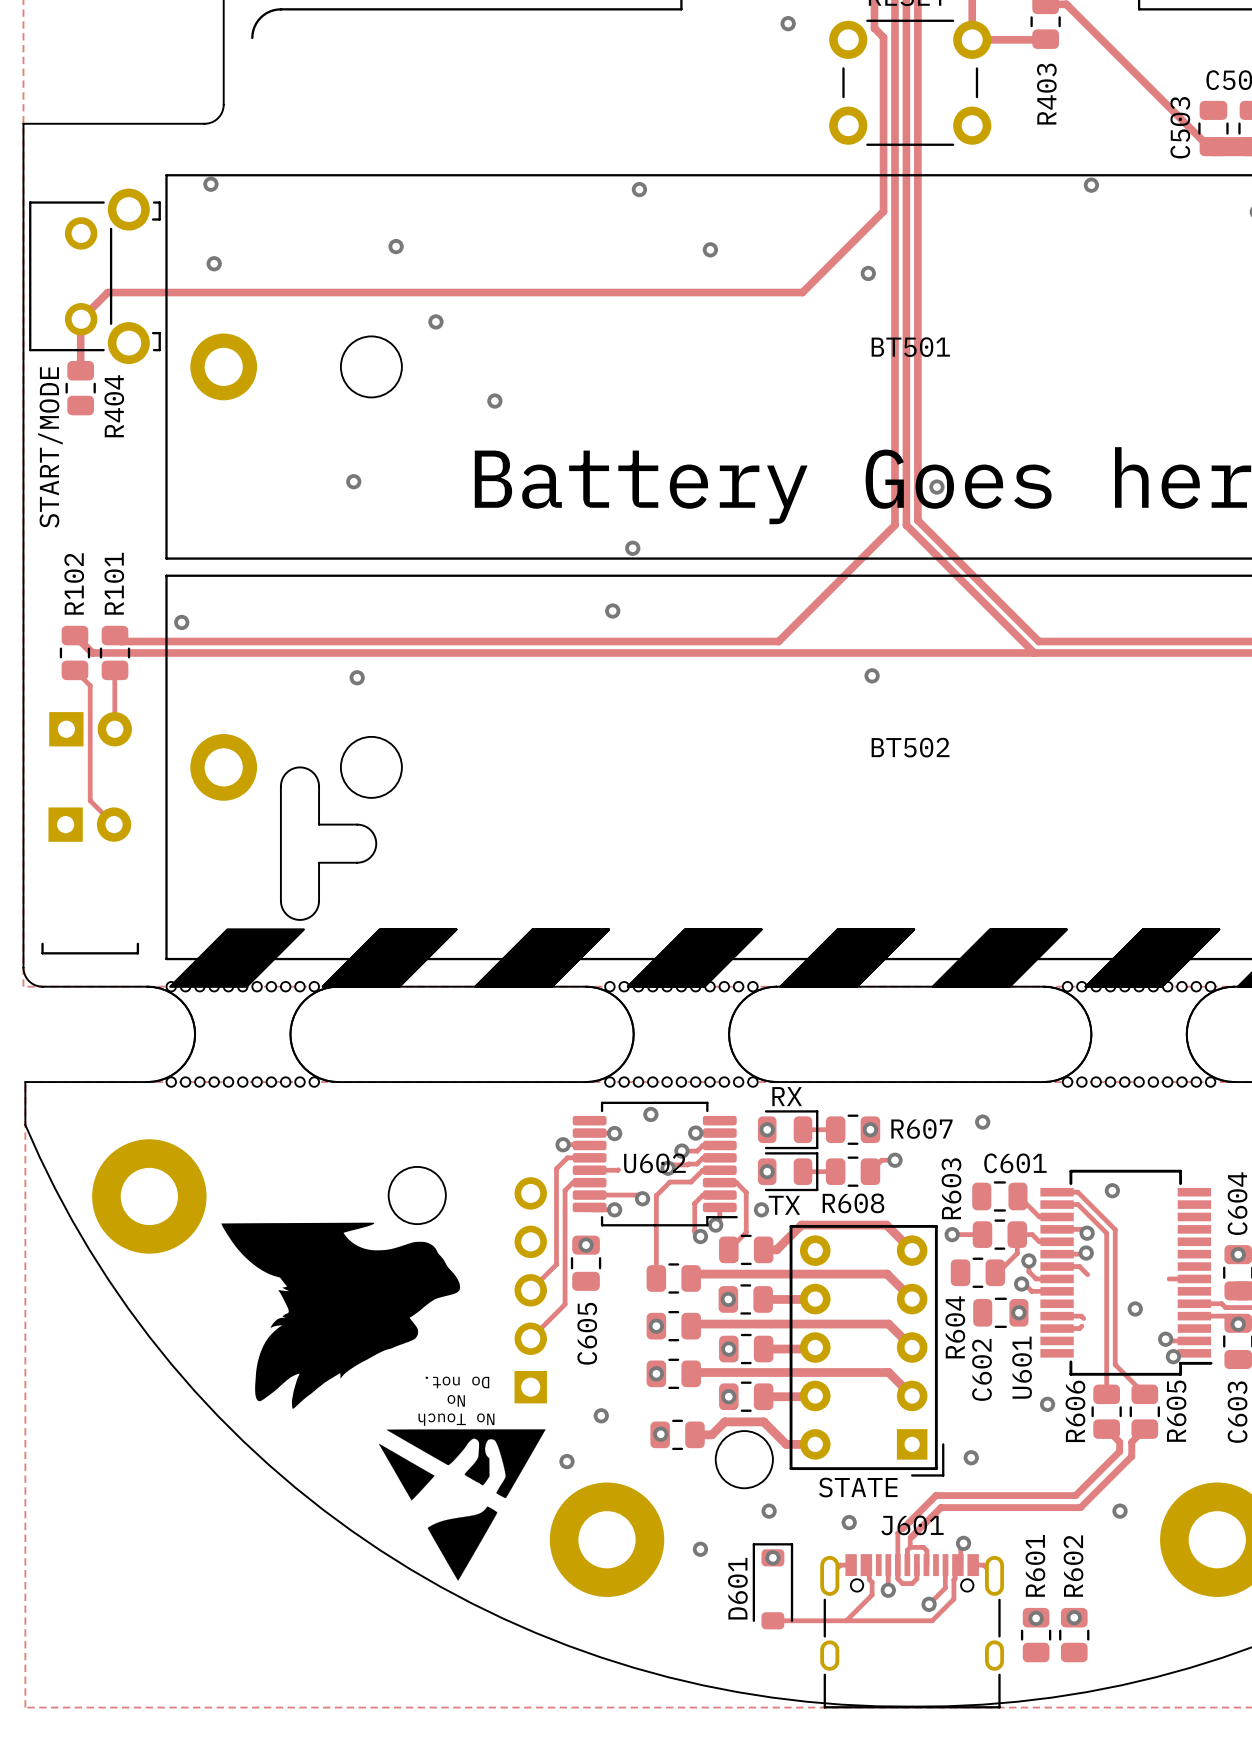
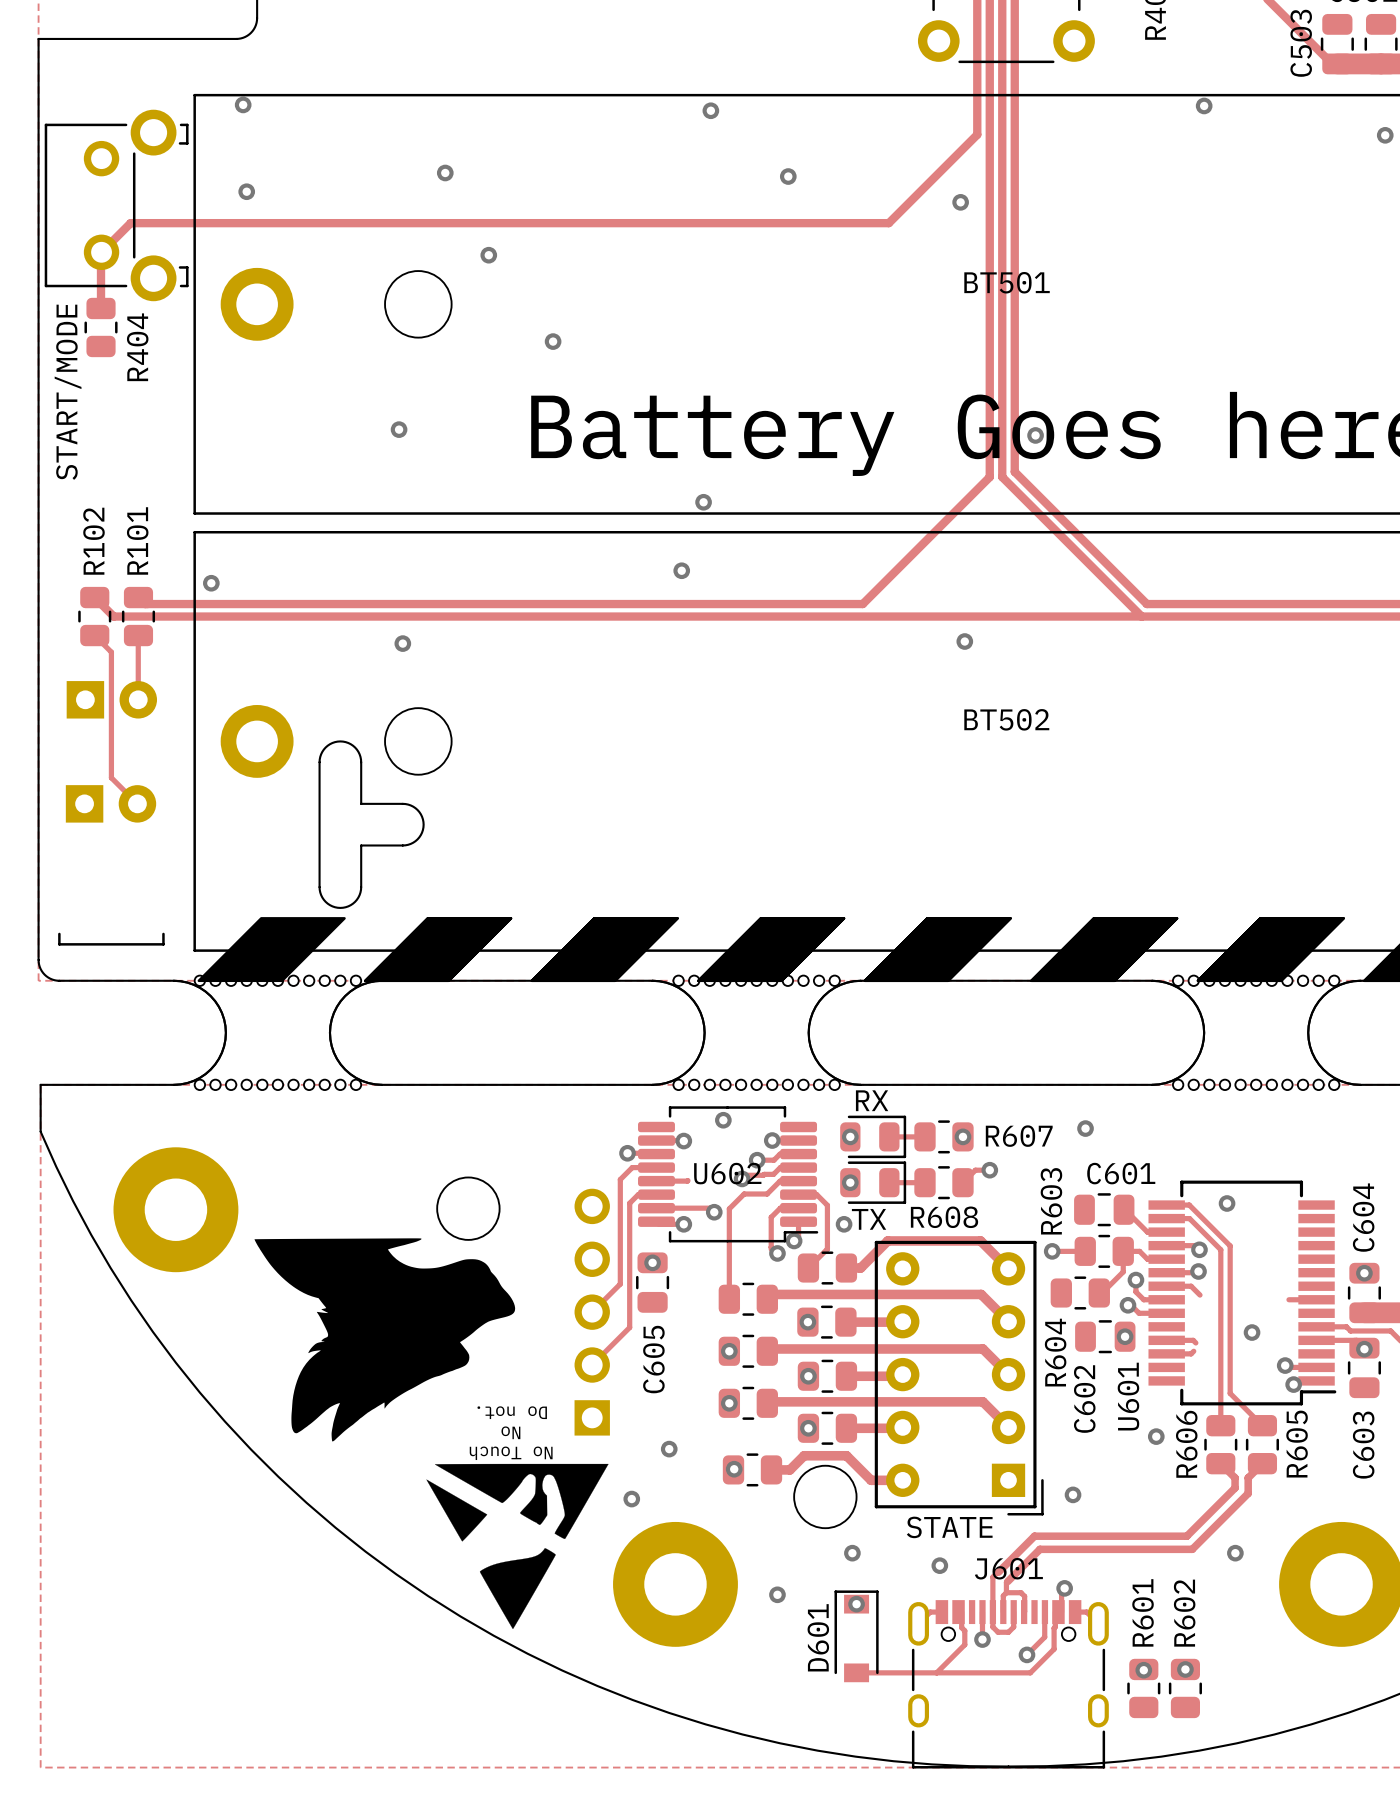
D601 footprint: [752, 1543, 794, 1630] -> [834, 1590, 879, 1683]

